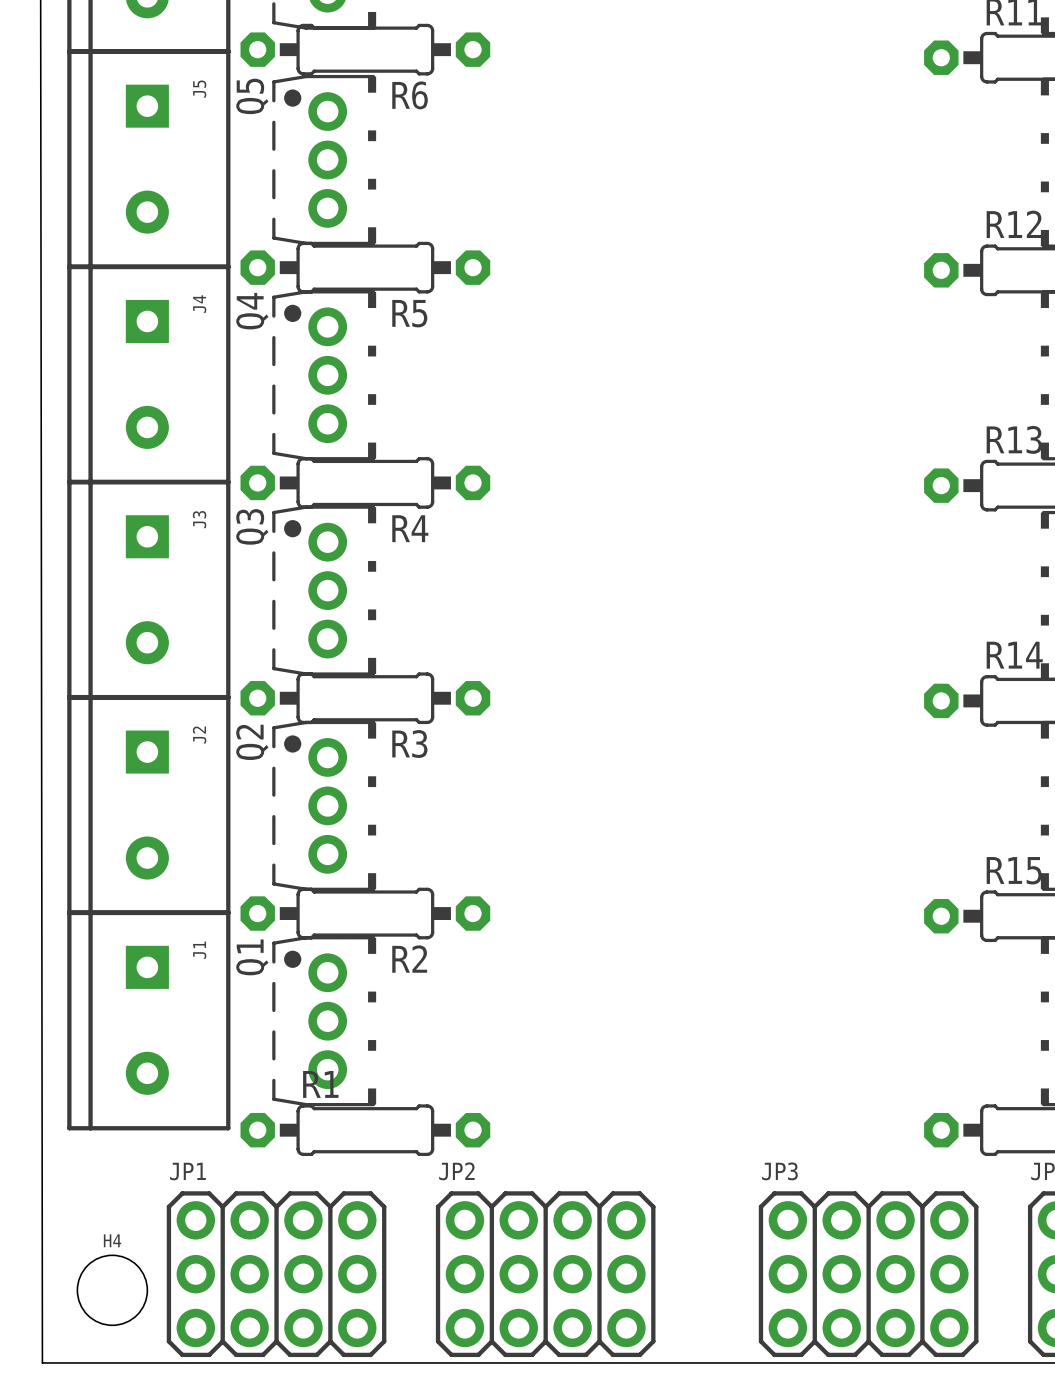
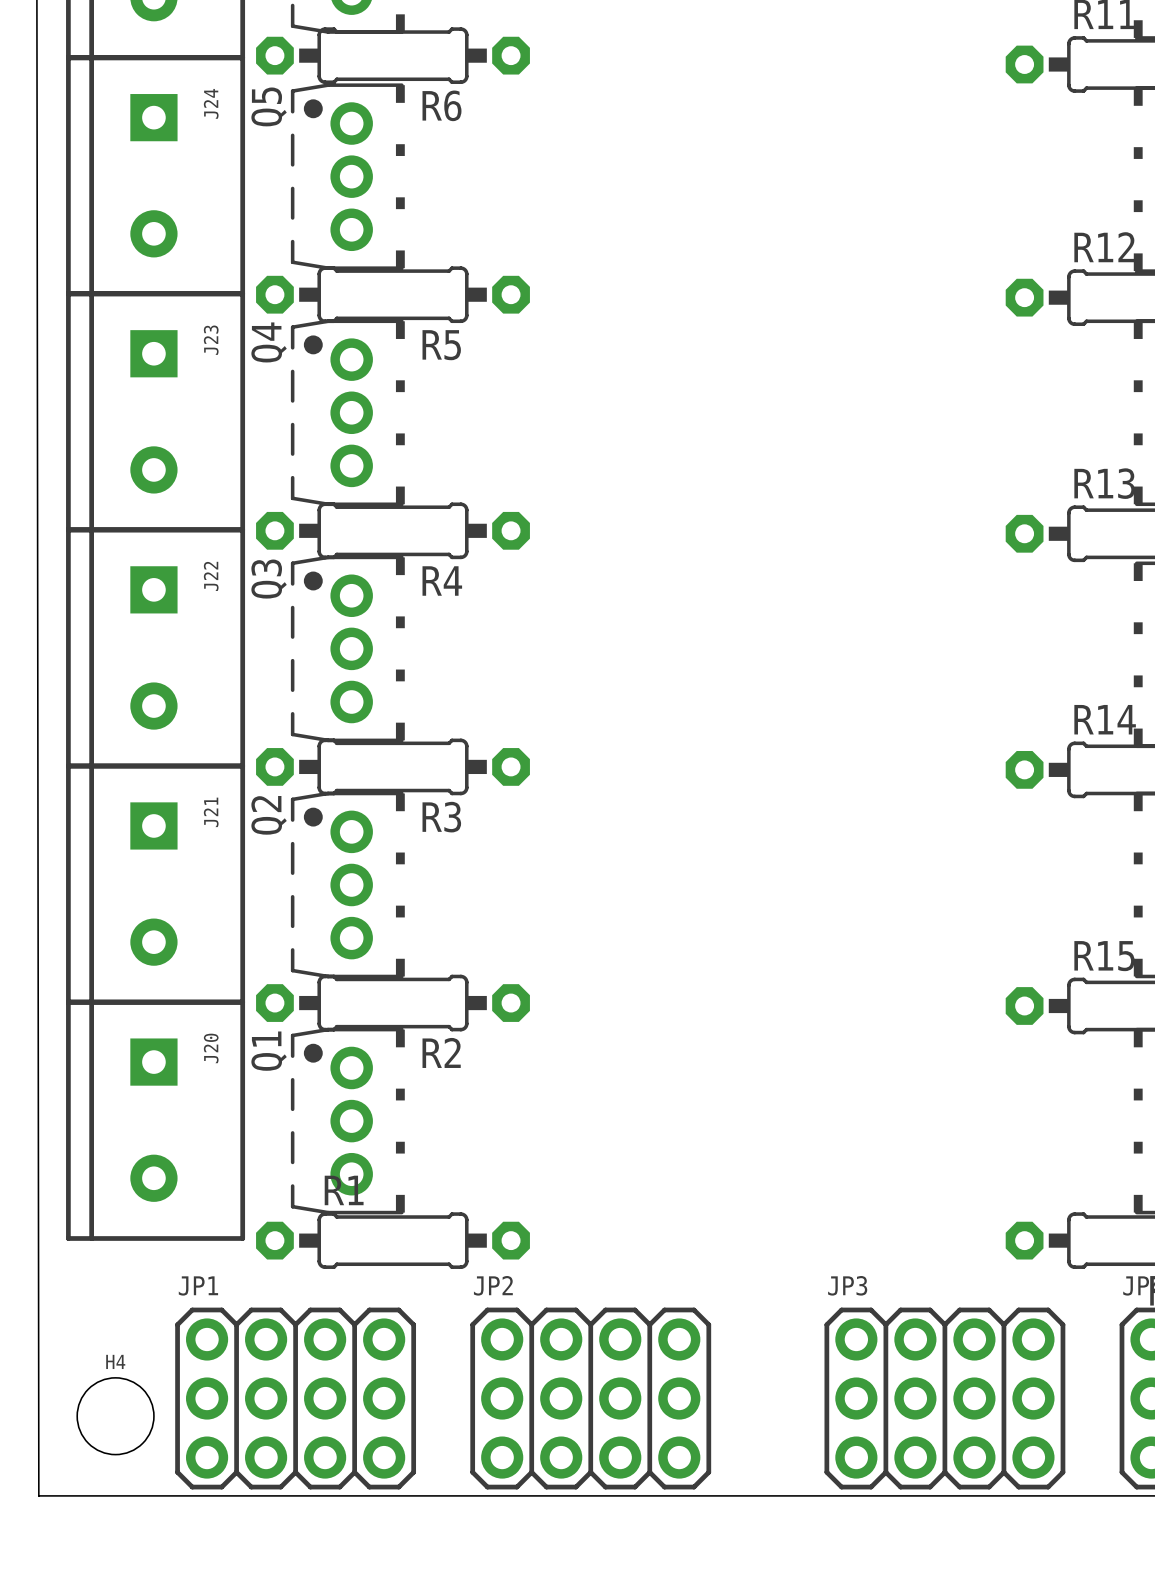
J5 name: J5 (199, 89) -> J24 (211, 103)
J4 name: J4 (199, 304) -> J23 (211, 340)
J3 name: J3 (199, 519) -> J22 (211, 576)
J2 name: J2 (199, 735) -> J21 (211, 812)
J1 name: J1 (199, 950) -> J20 (211, 1048)

